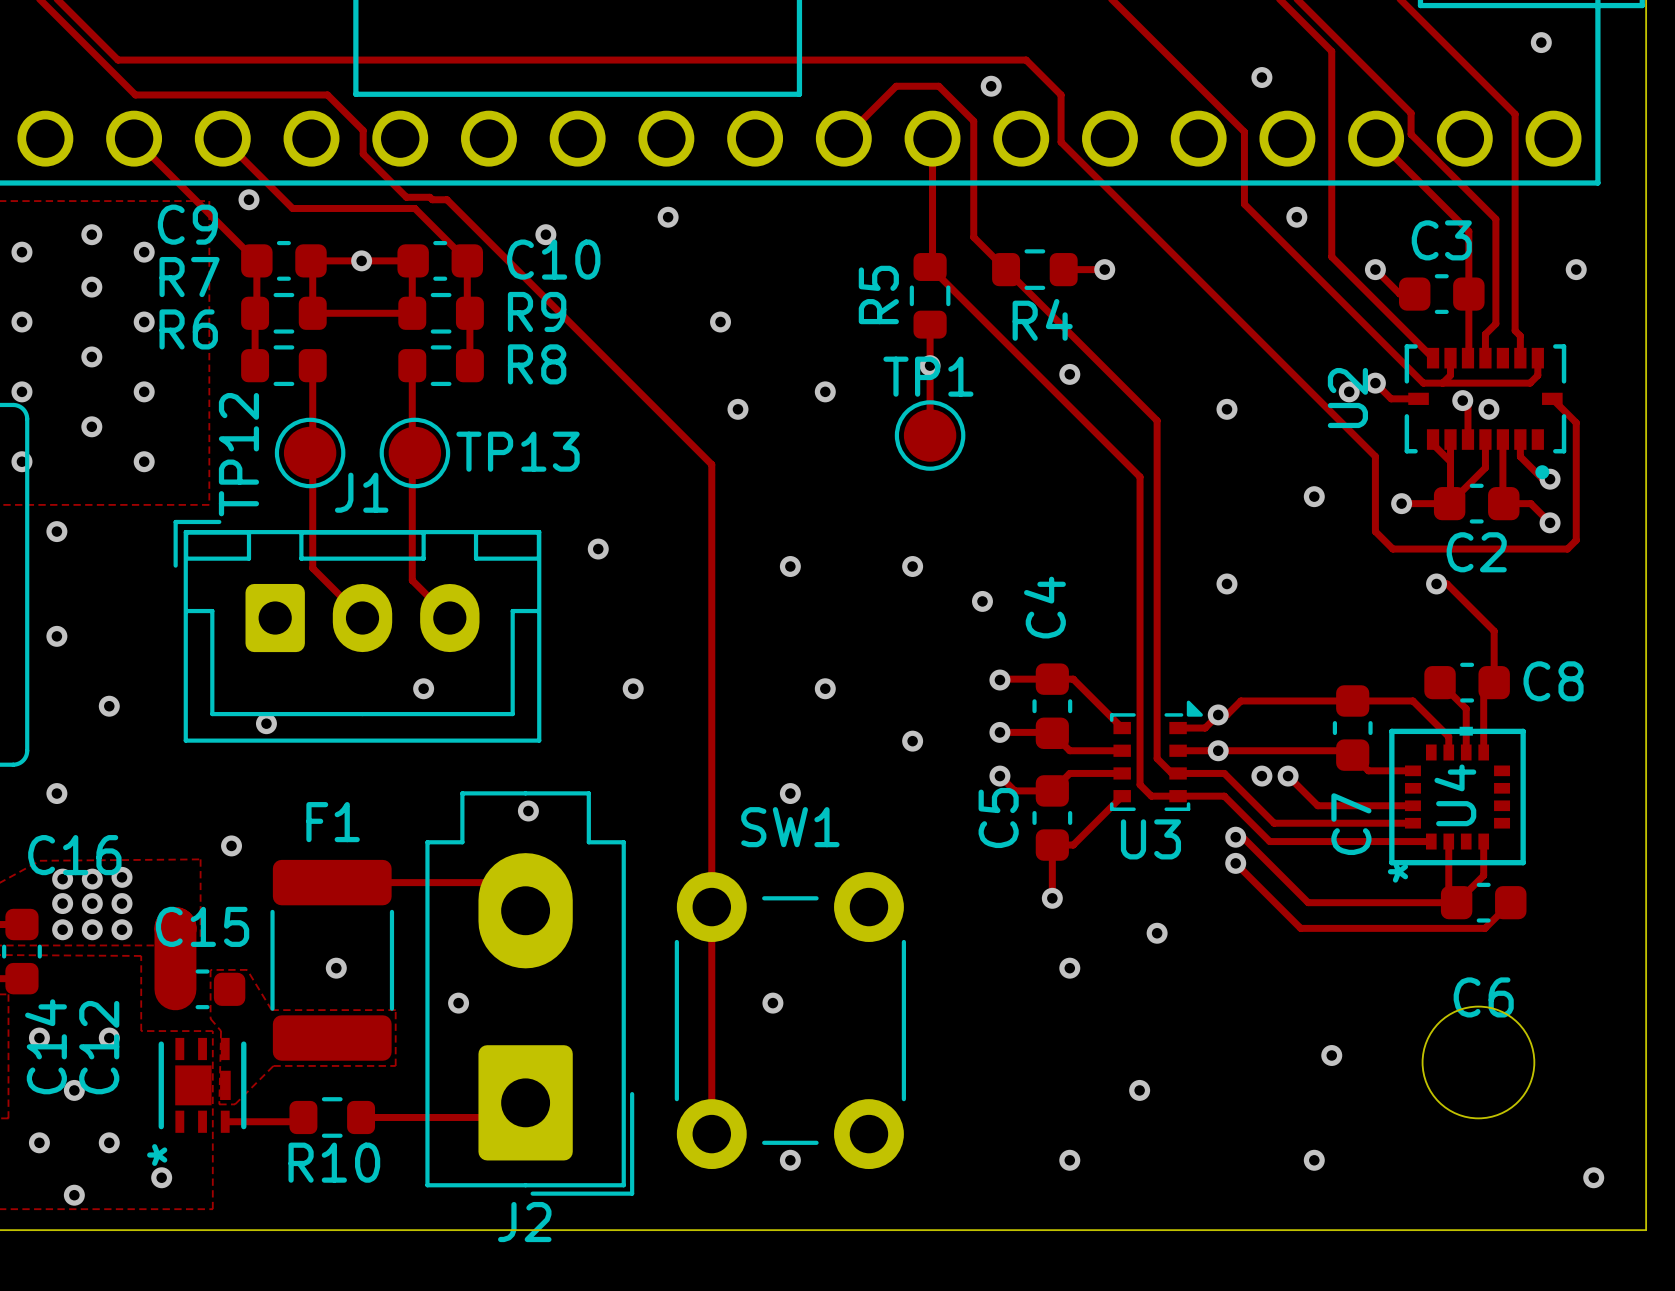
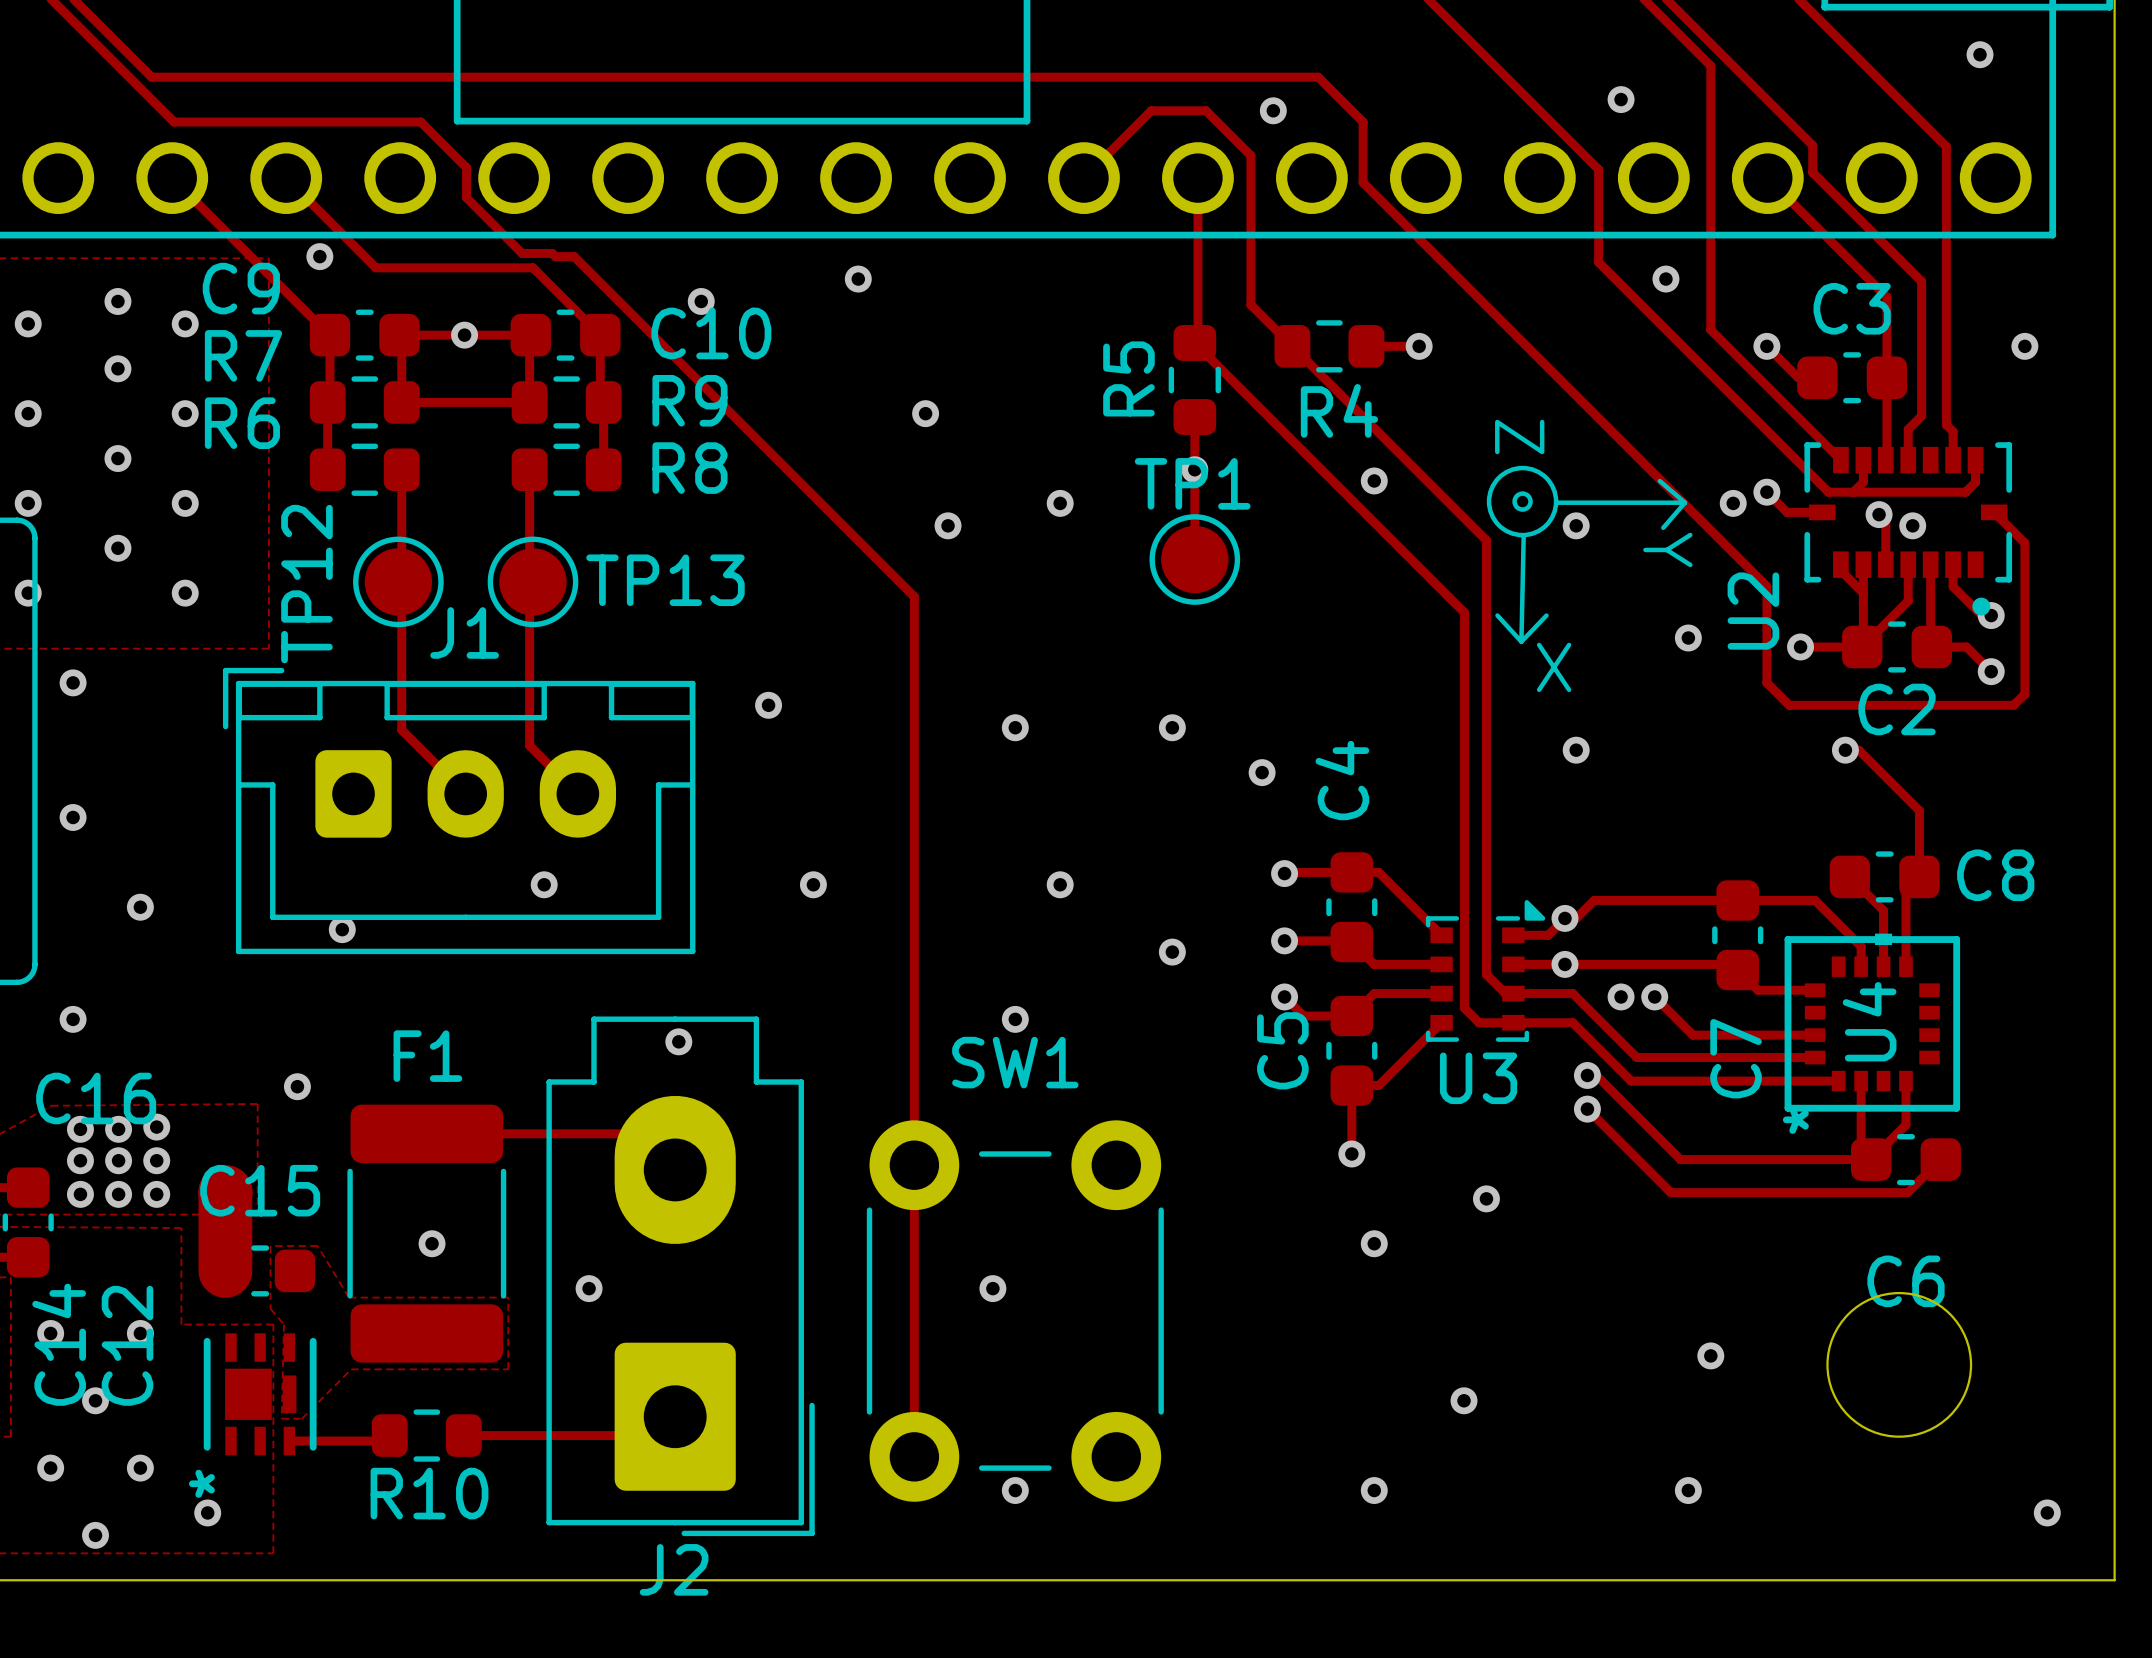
text: none -> Z (1519, 436)
drawing: none -> [1486, 465, 1559, 538]
line: none -> (1659, 481) (1684, 502)
line: none -> (1556, 502) (1684, 502)
line: none -> (1684, 502) (1663, 527)
U2 name position: U2 (1347, 398) -> U2 (1753, 611)
line: none -> (1523, 535) (1521, 641)
text: none -> Y (1667, 549)
line: none -> (1497, 615) (1521, 641)
line: none -> (1546, 615) (1521, 641)
text: none -> X (1554, 667)

